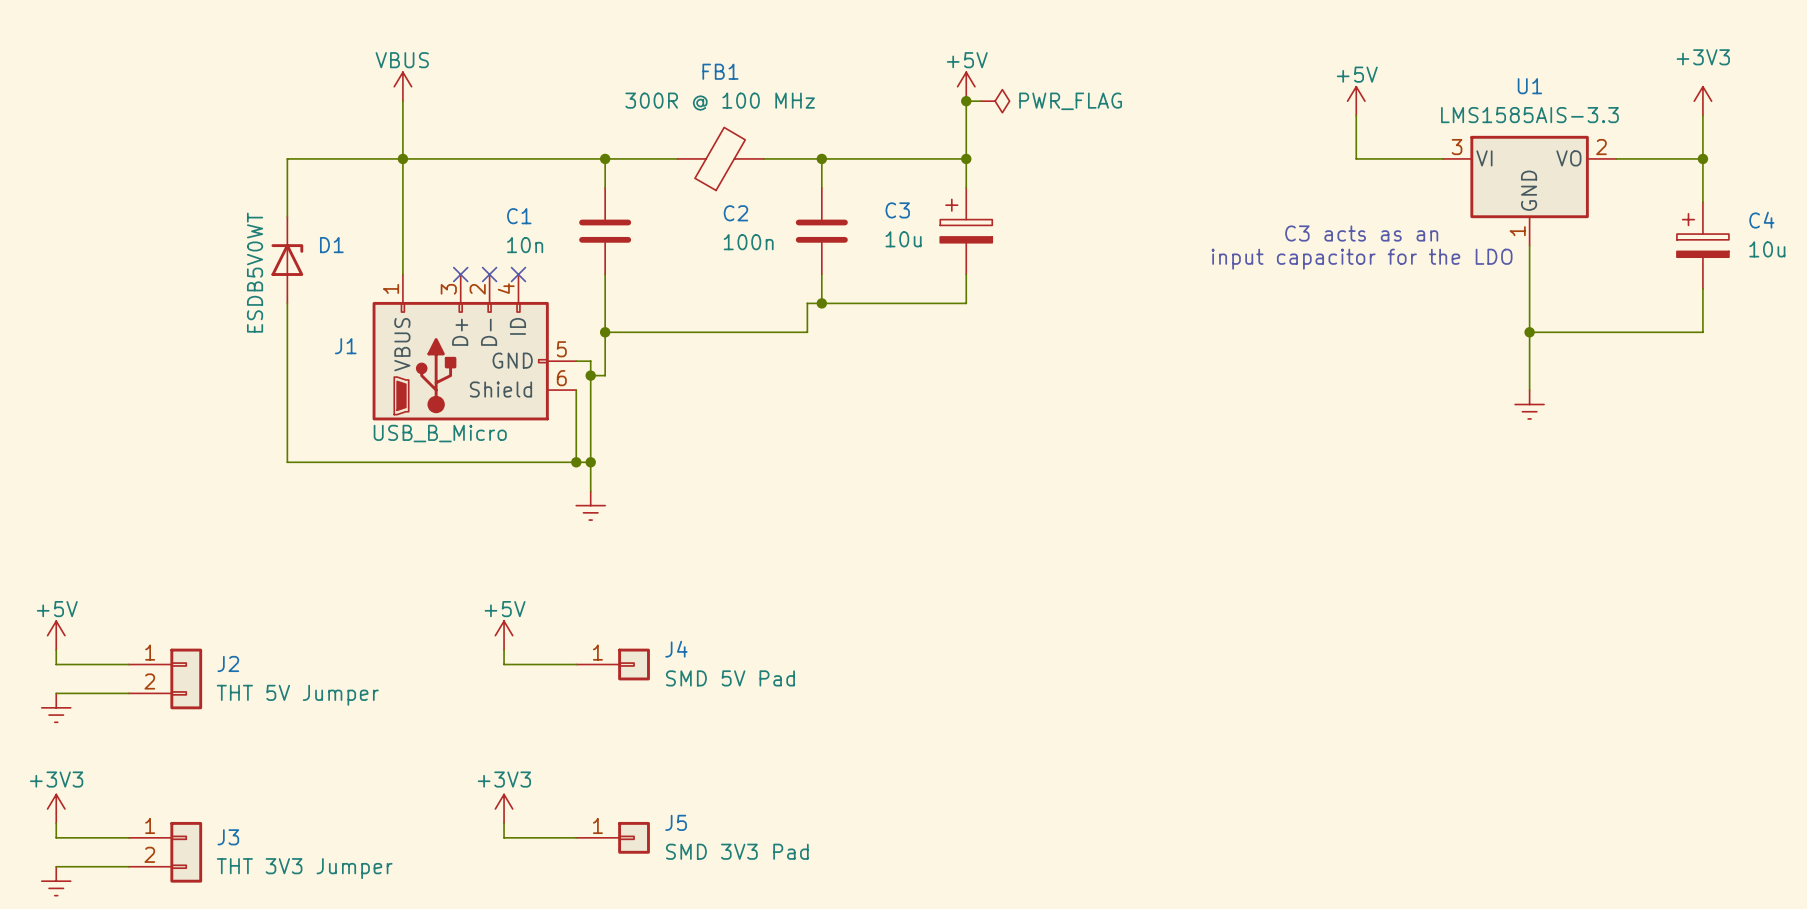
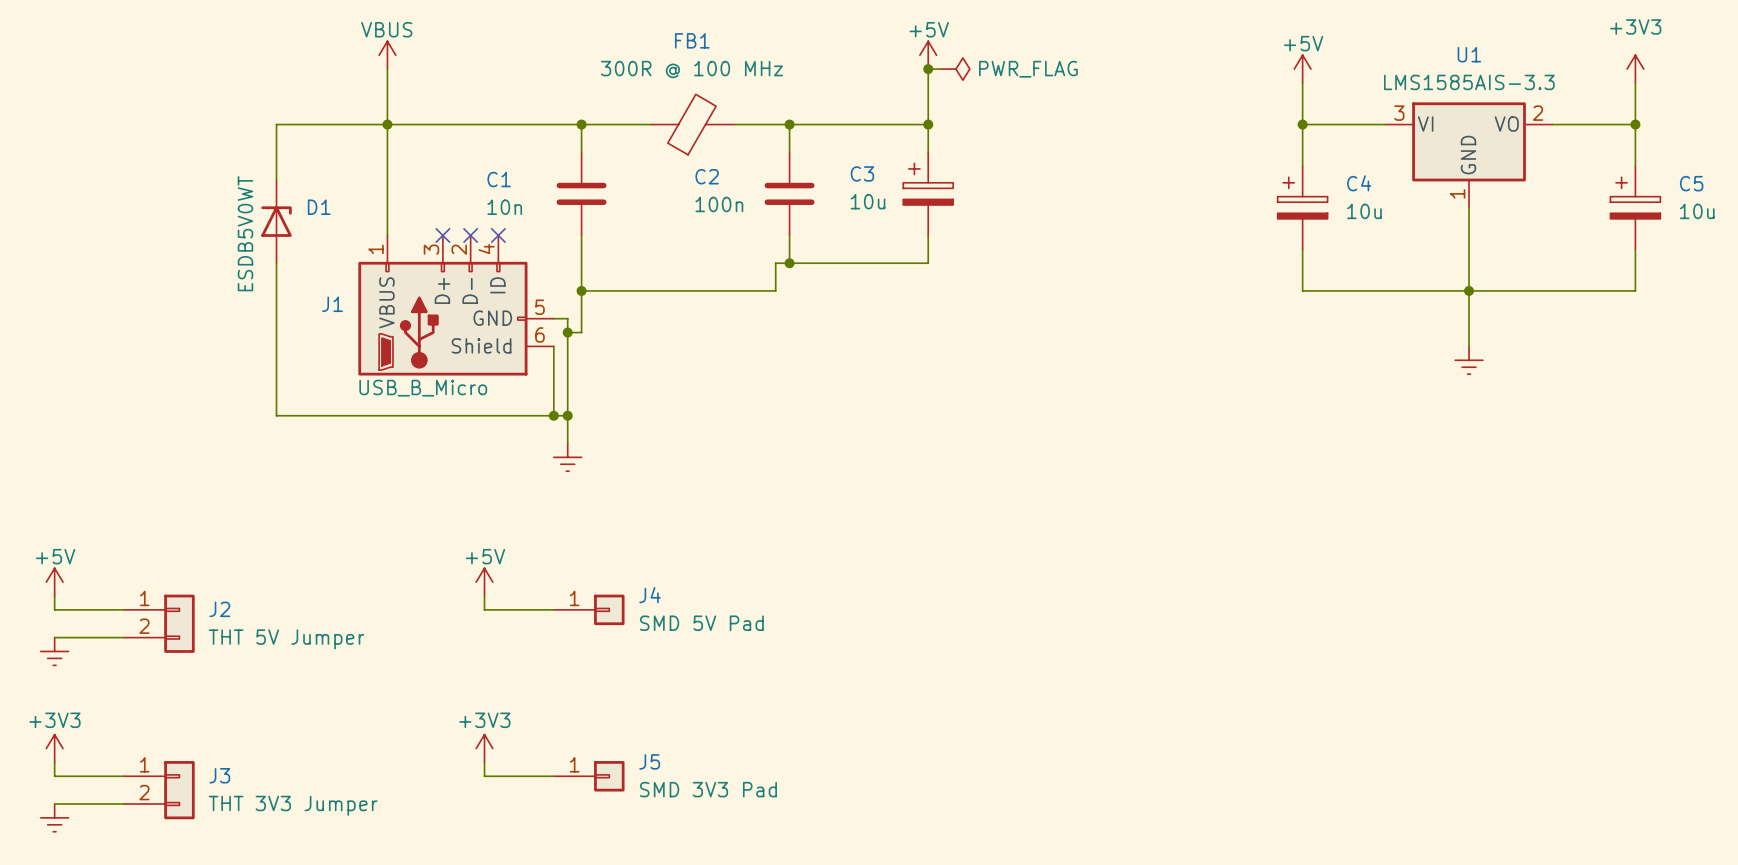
wire: none -> (1302, 124) (1302, 166)
junction: none -> (1302, 124)
C4 name: C4 (1761, 220) -> C5 (1691, 183)
text: C3 acts as an (1361, 233) -> none
C4: none -> 10u (1302, 207)
text: input capacitor for the LDO (1362, 259) -> none
wire: none -> (1302, 249) (1302, 290) (1469, 290)

